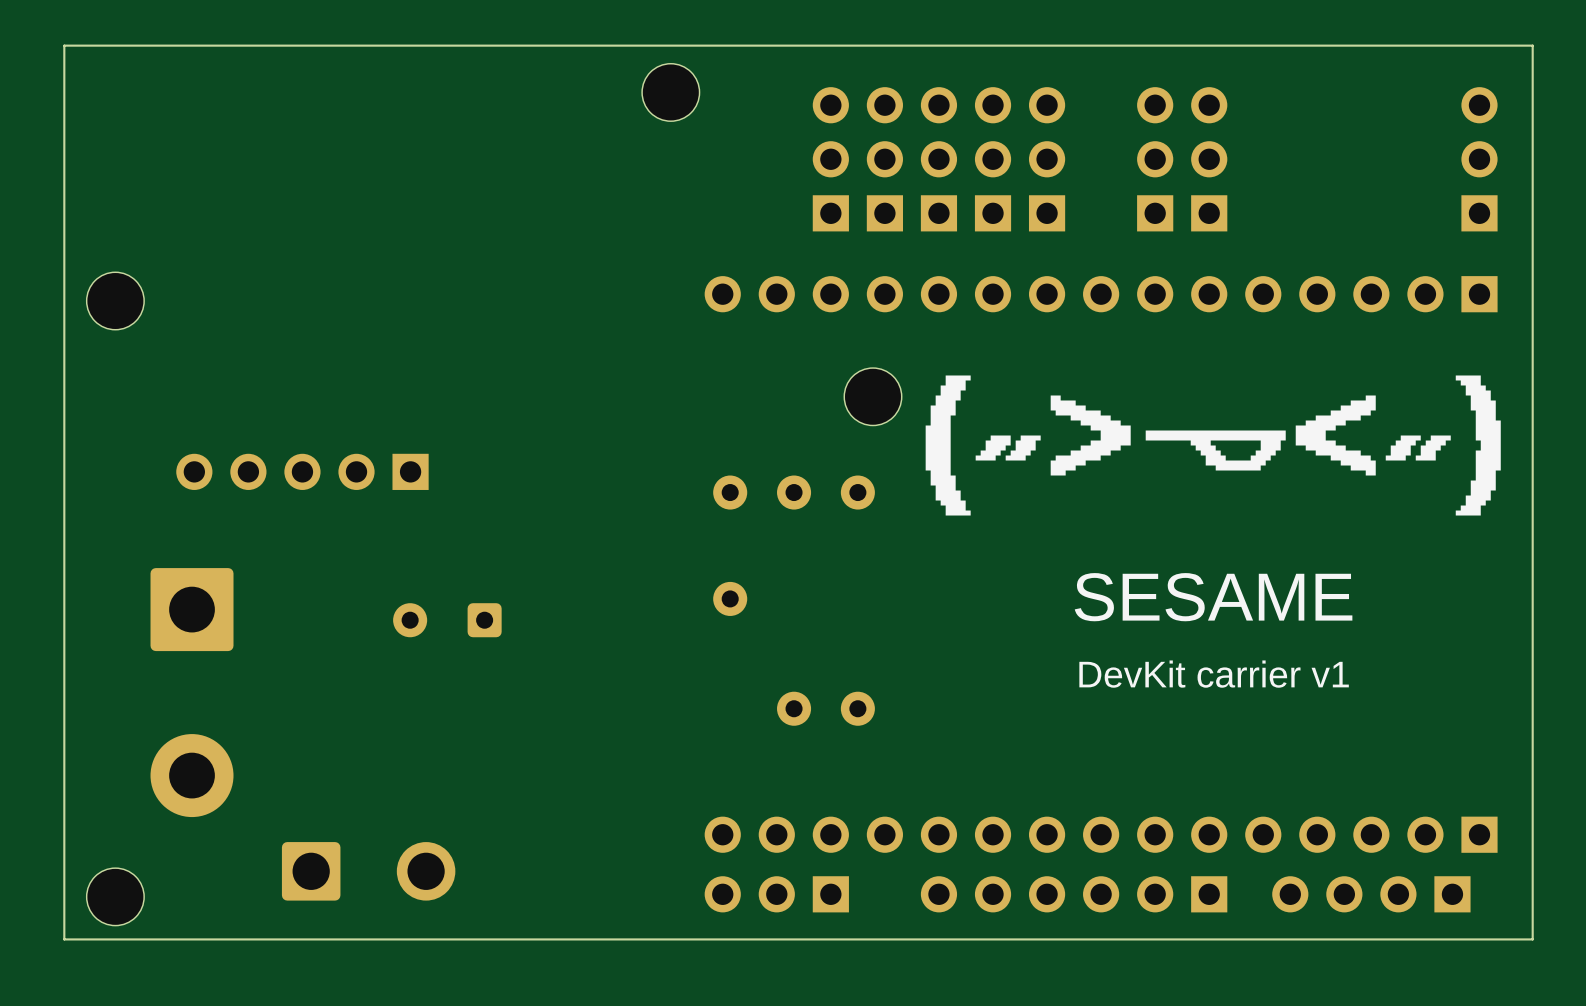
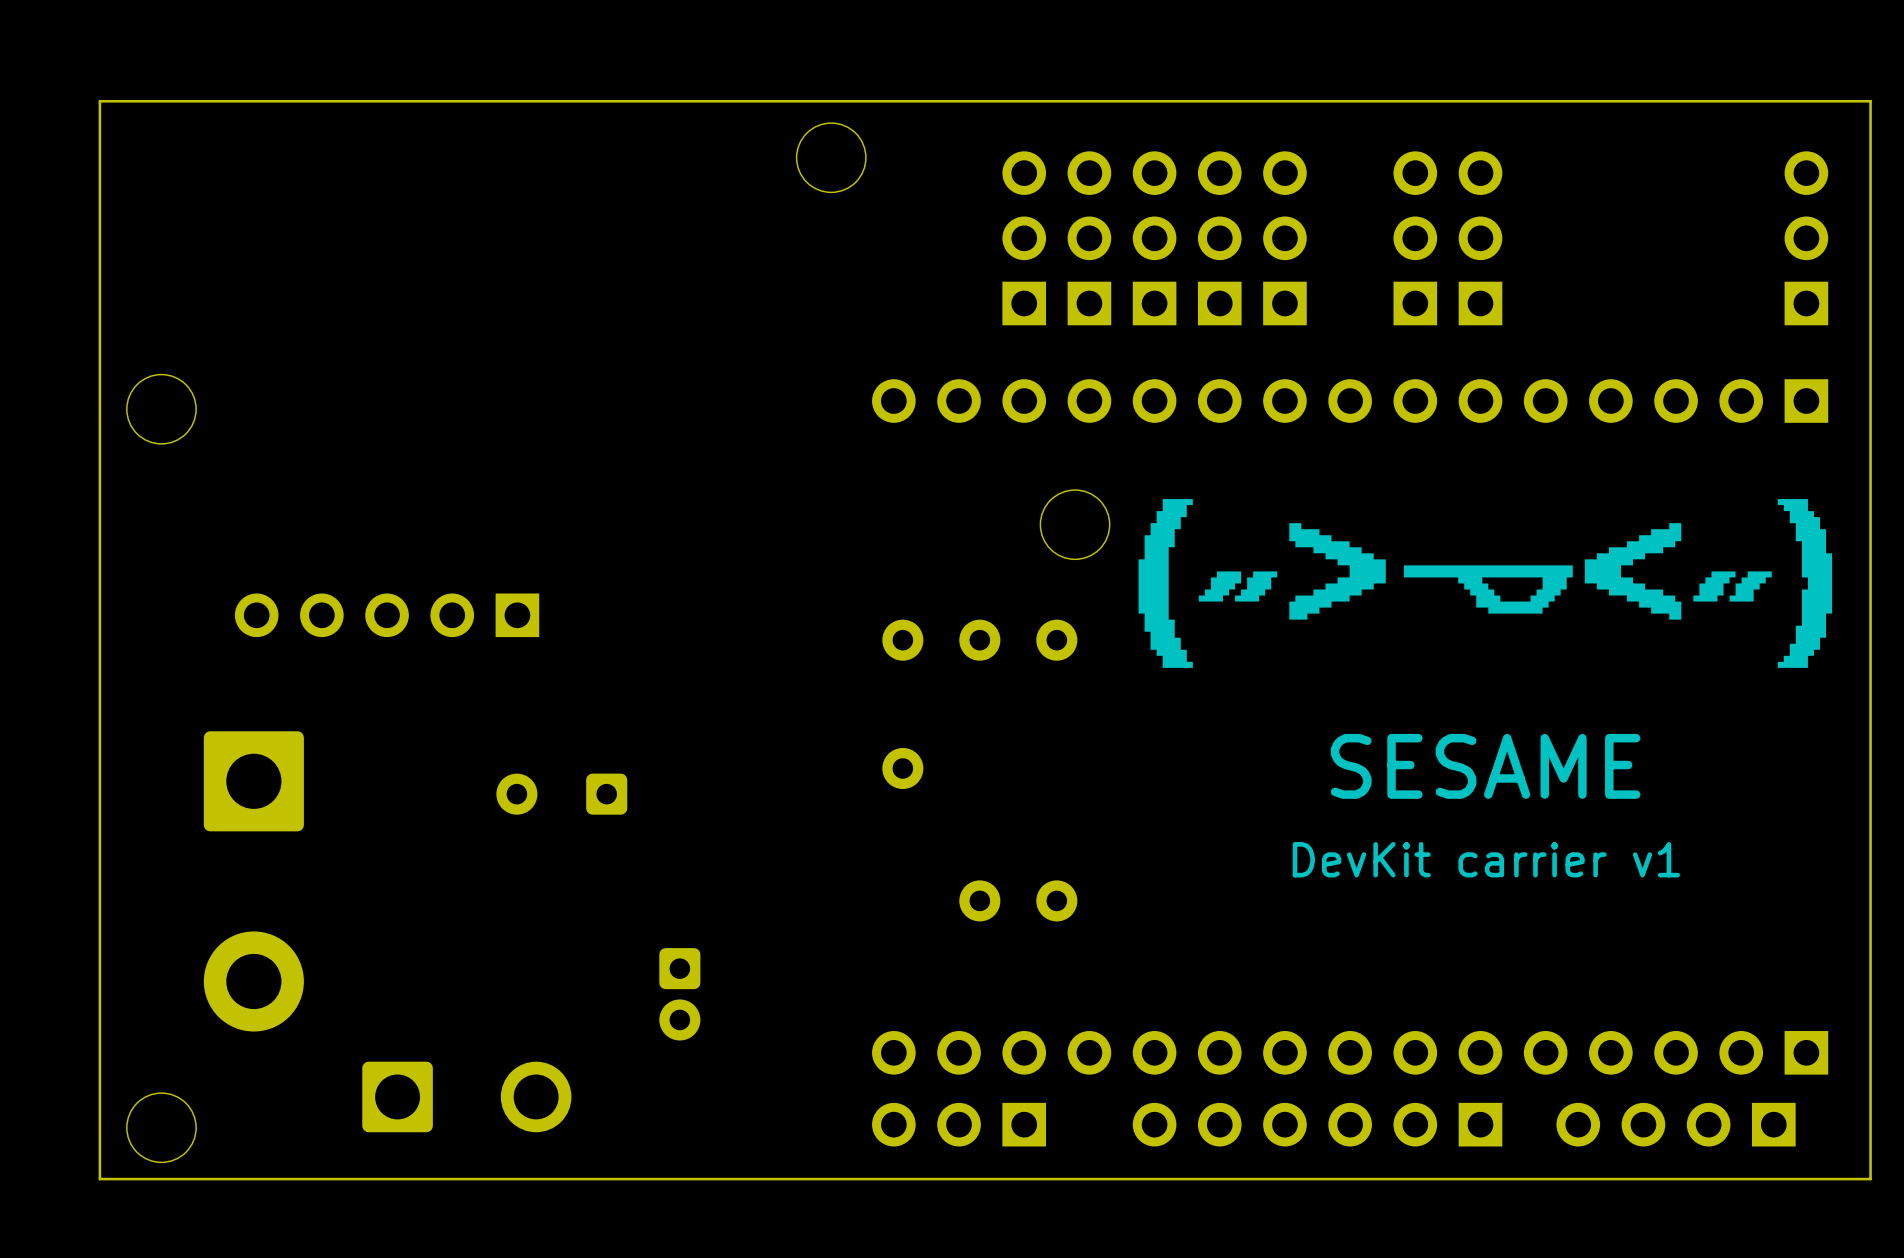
part: none -> (679, 994)

